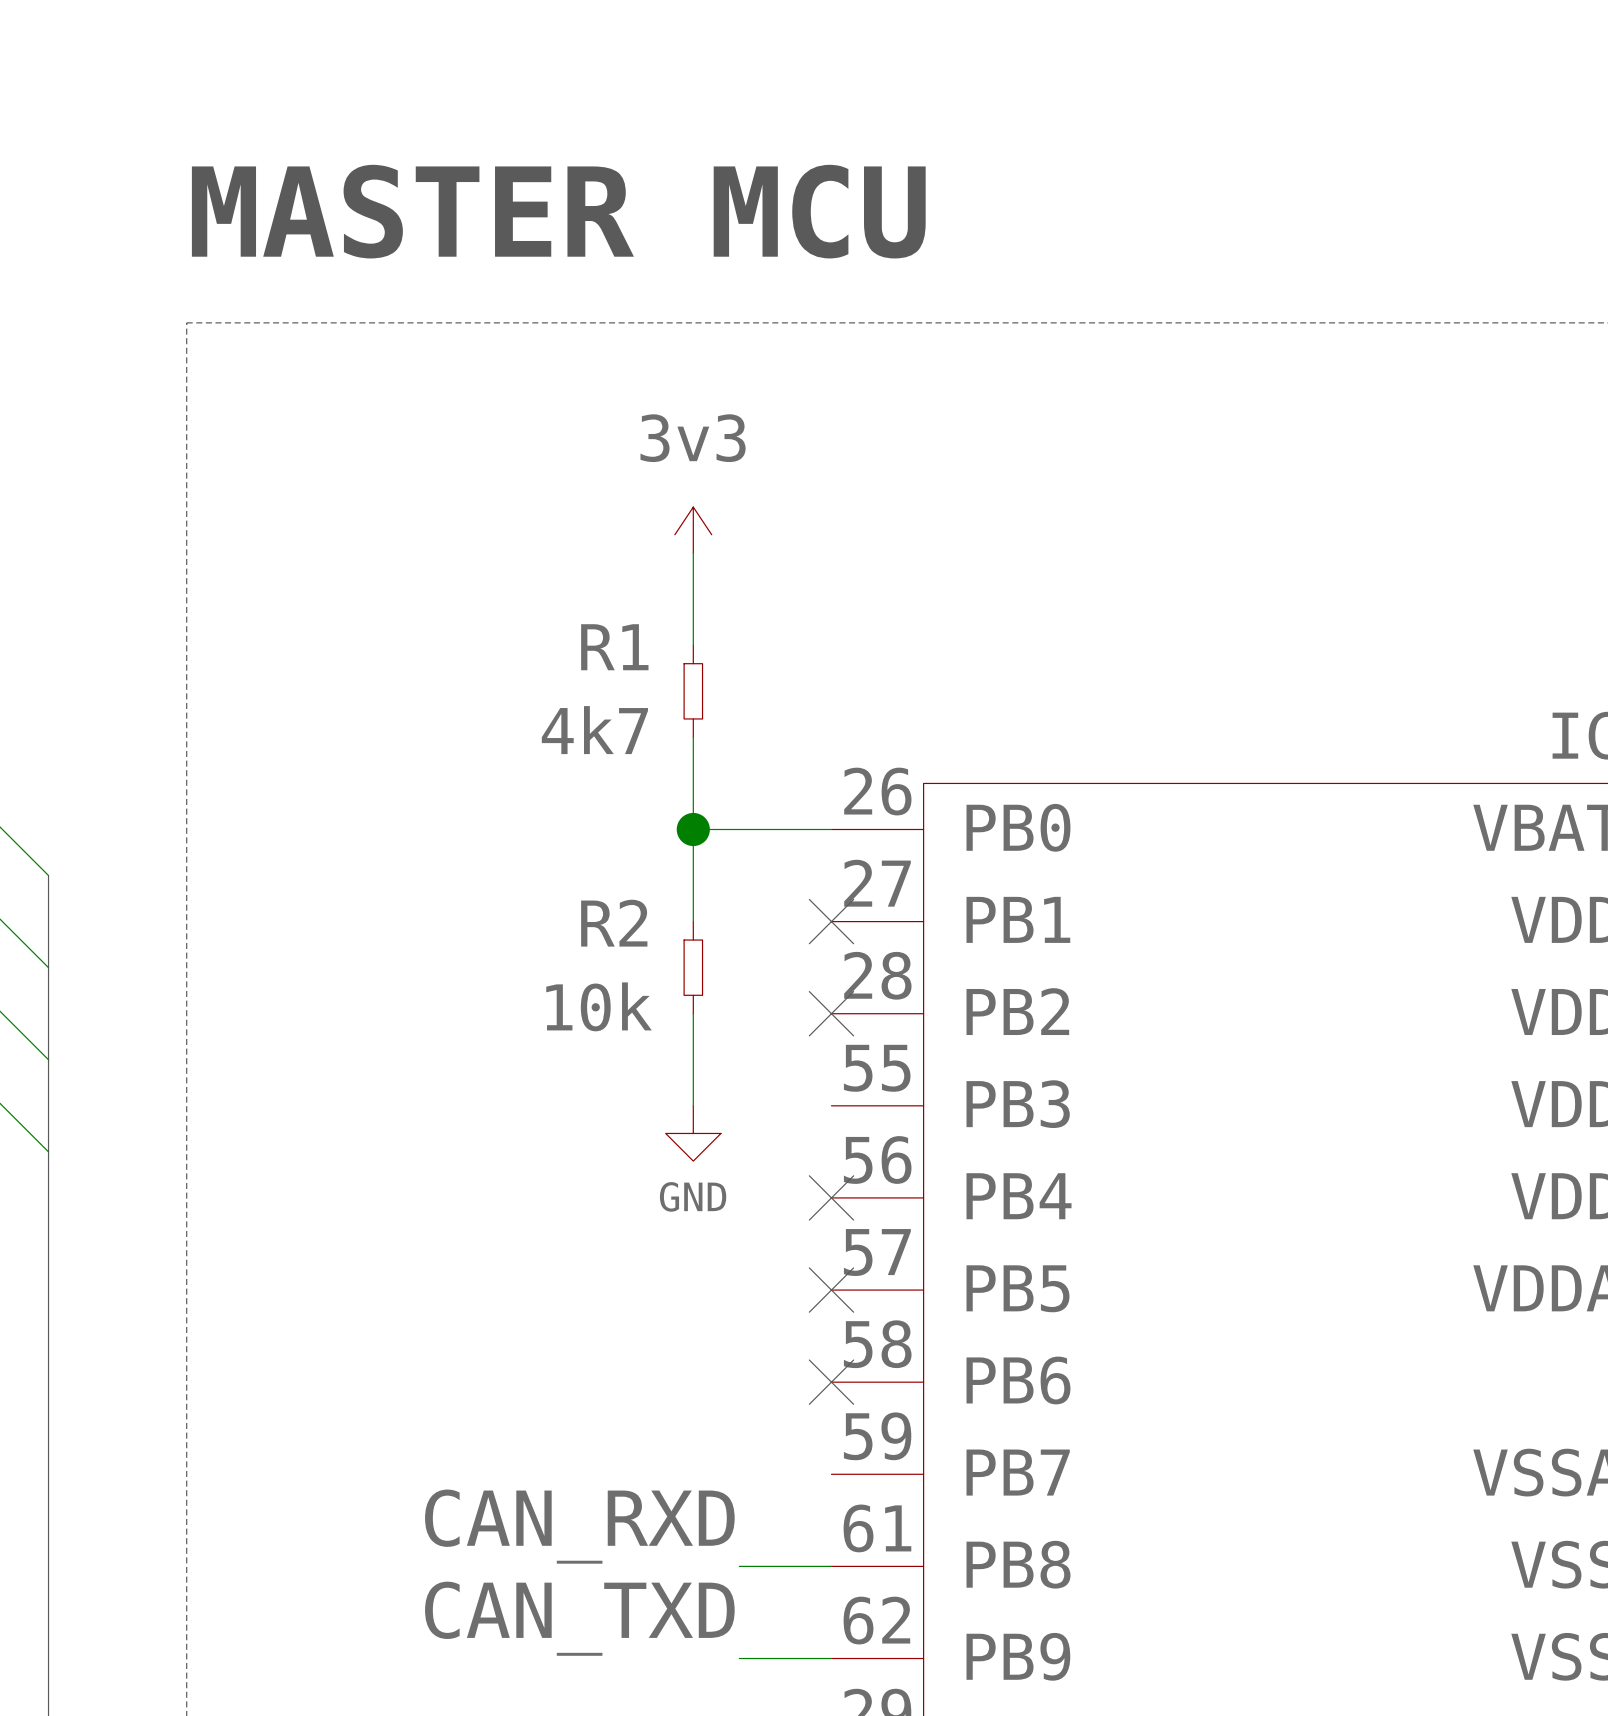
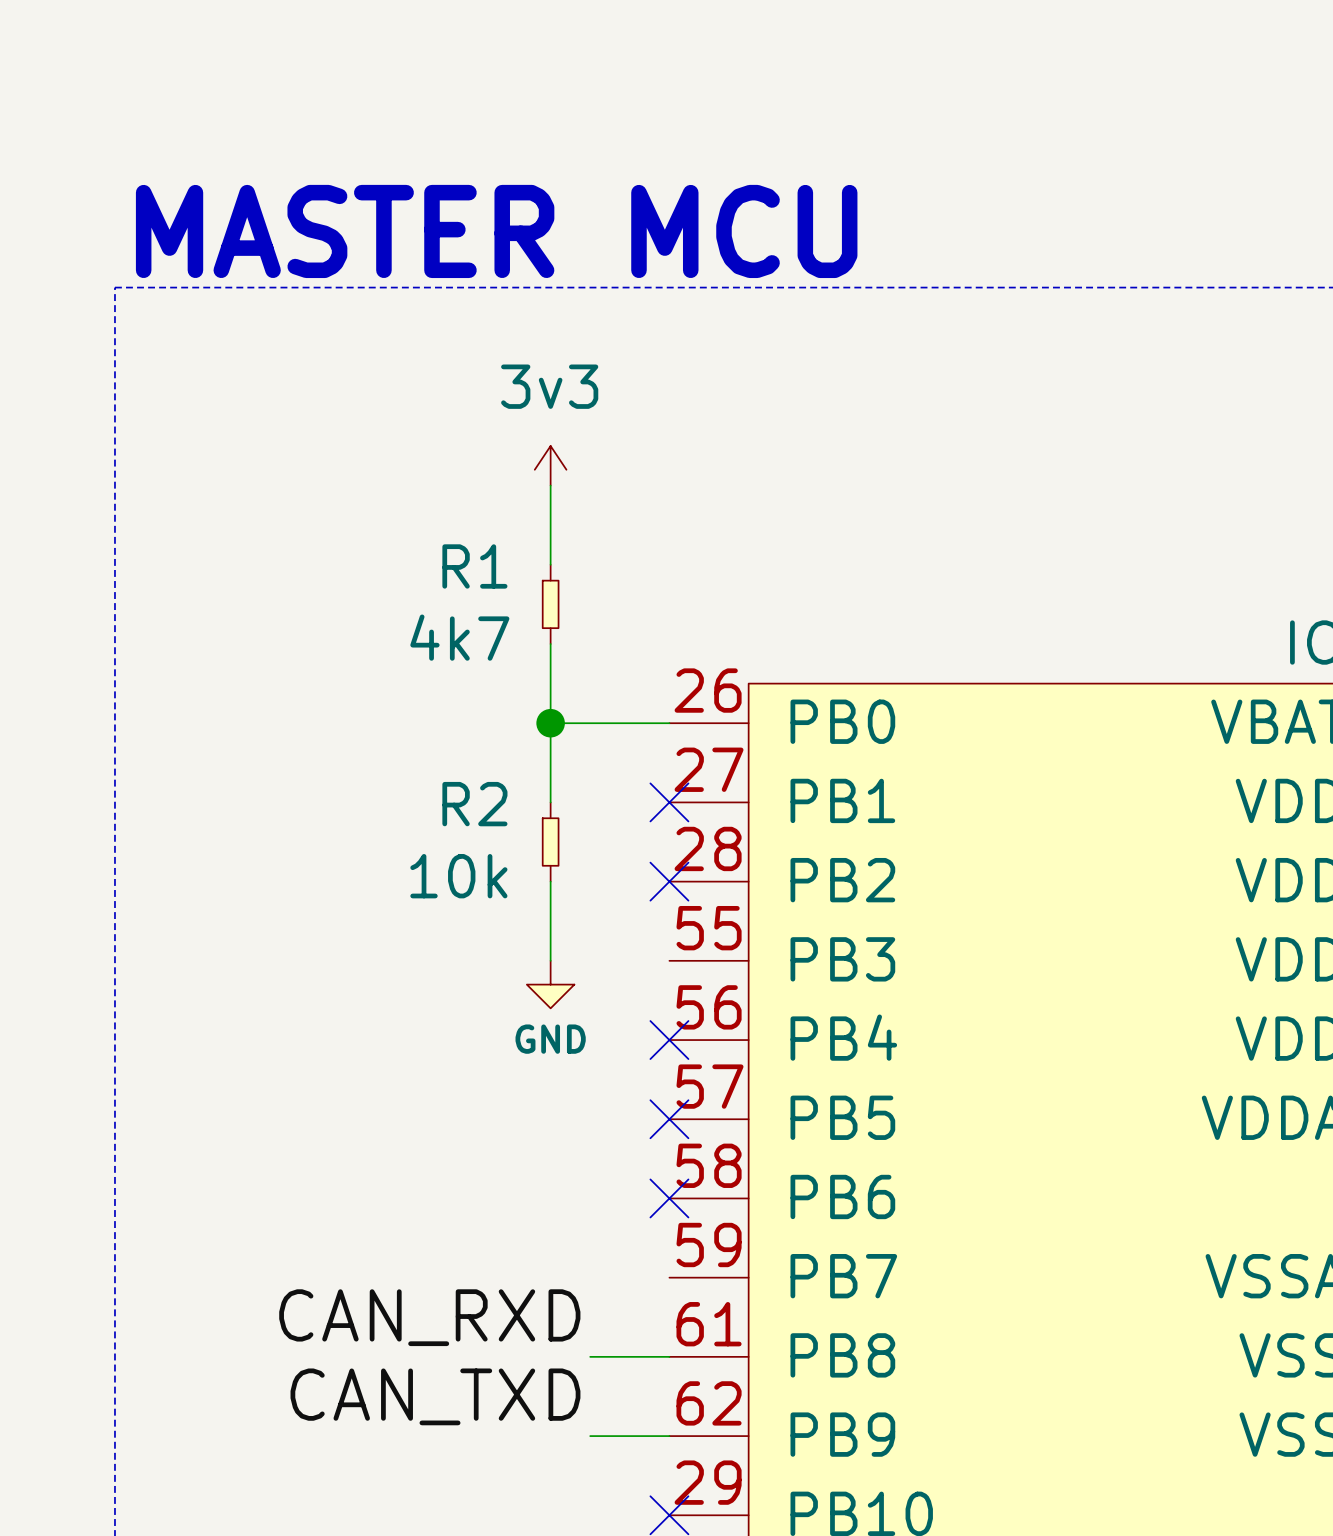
text position: MASTER MCU (558, 211) -> MASTER MCU (496, 231)

